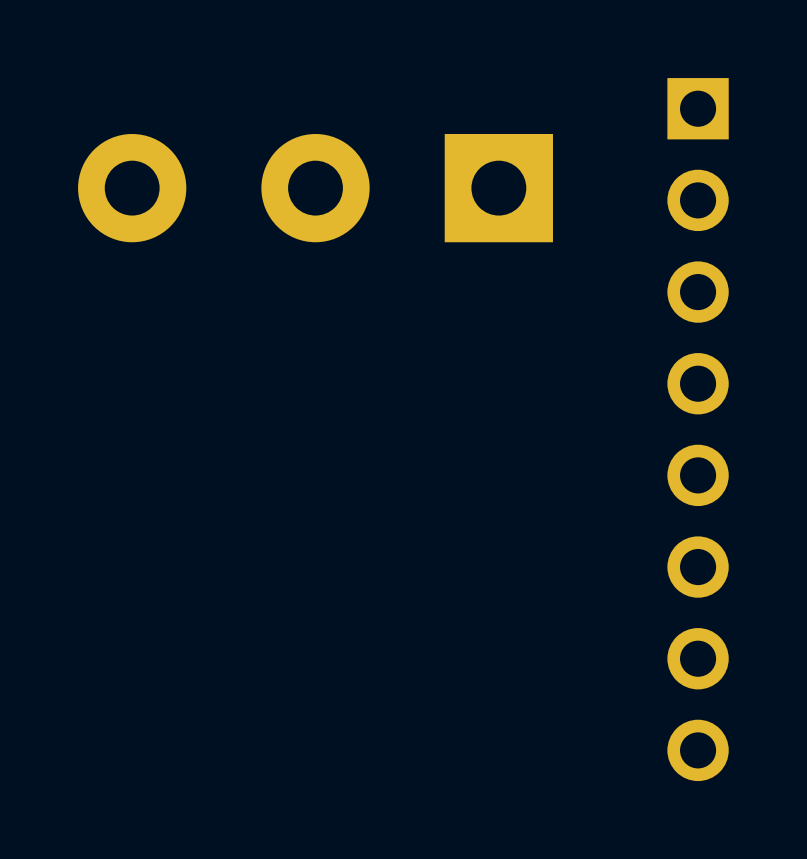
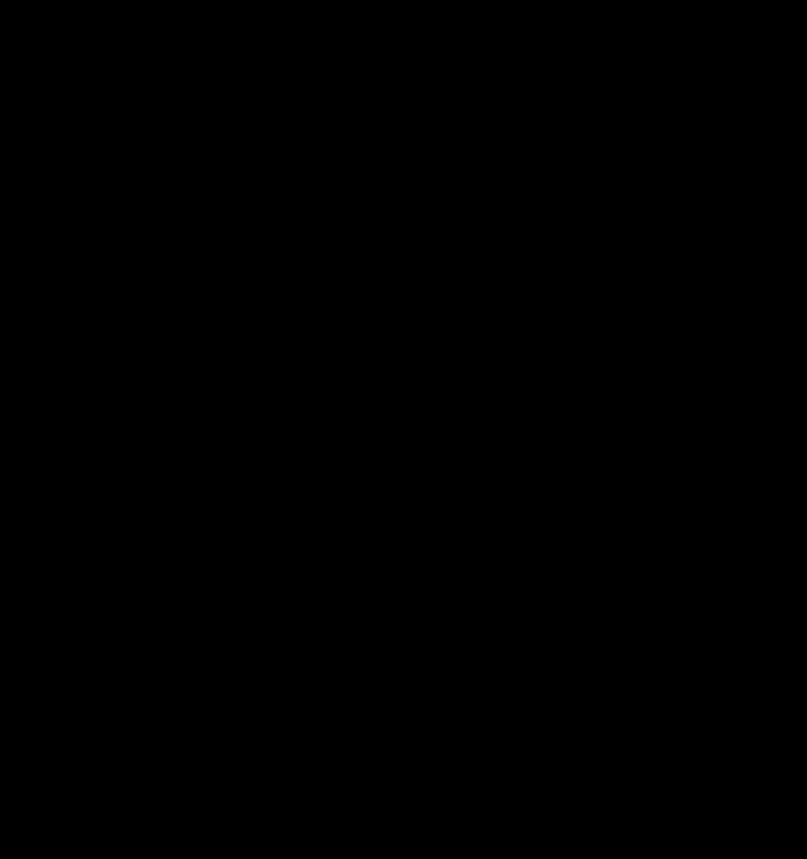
part: (315, 188) -> none
part: (698, 429) -> none

